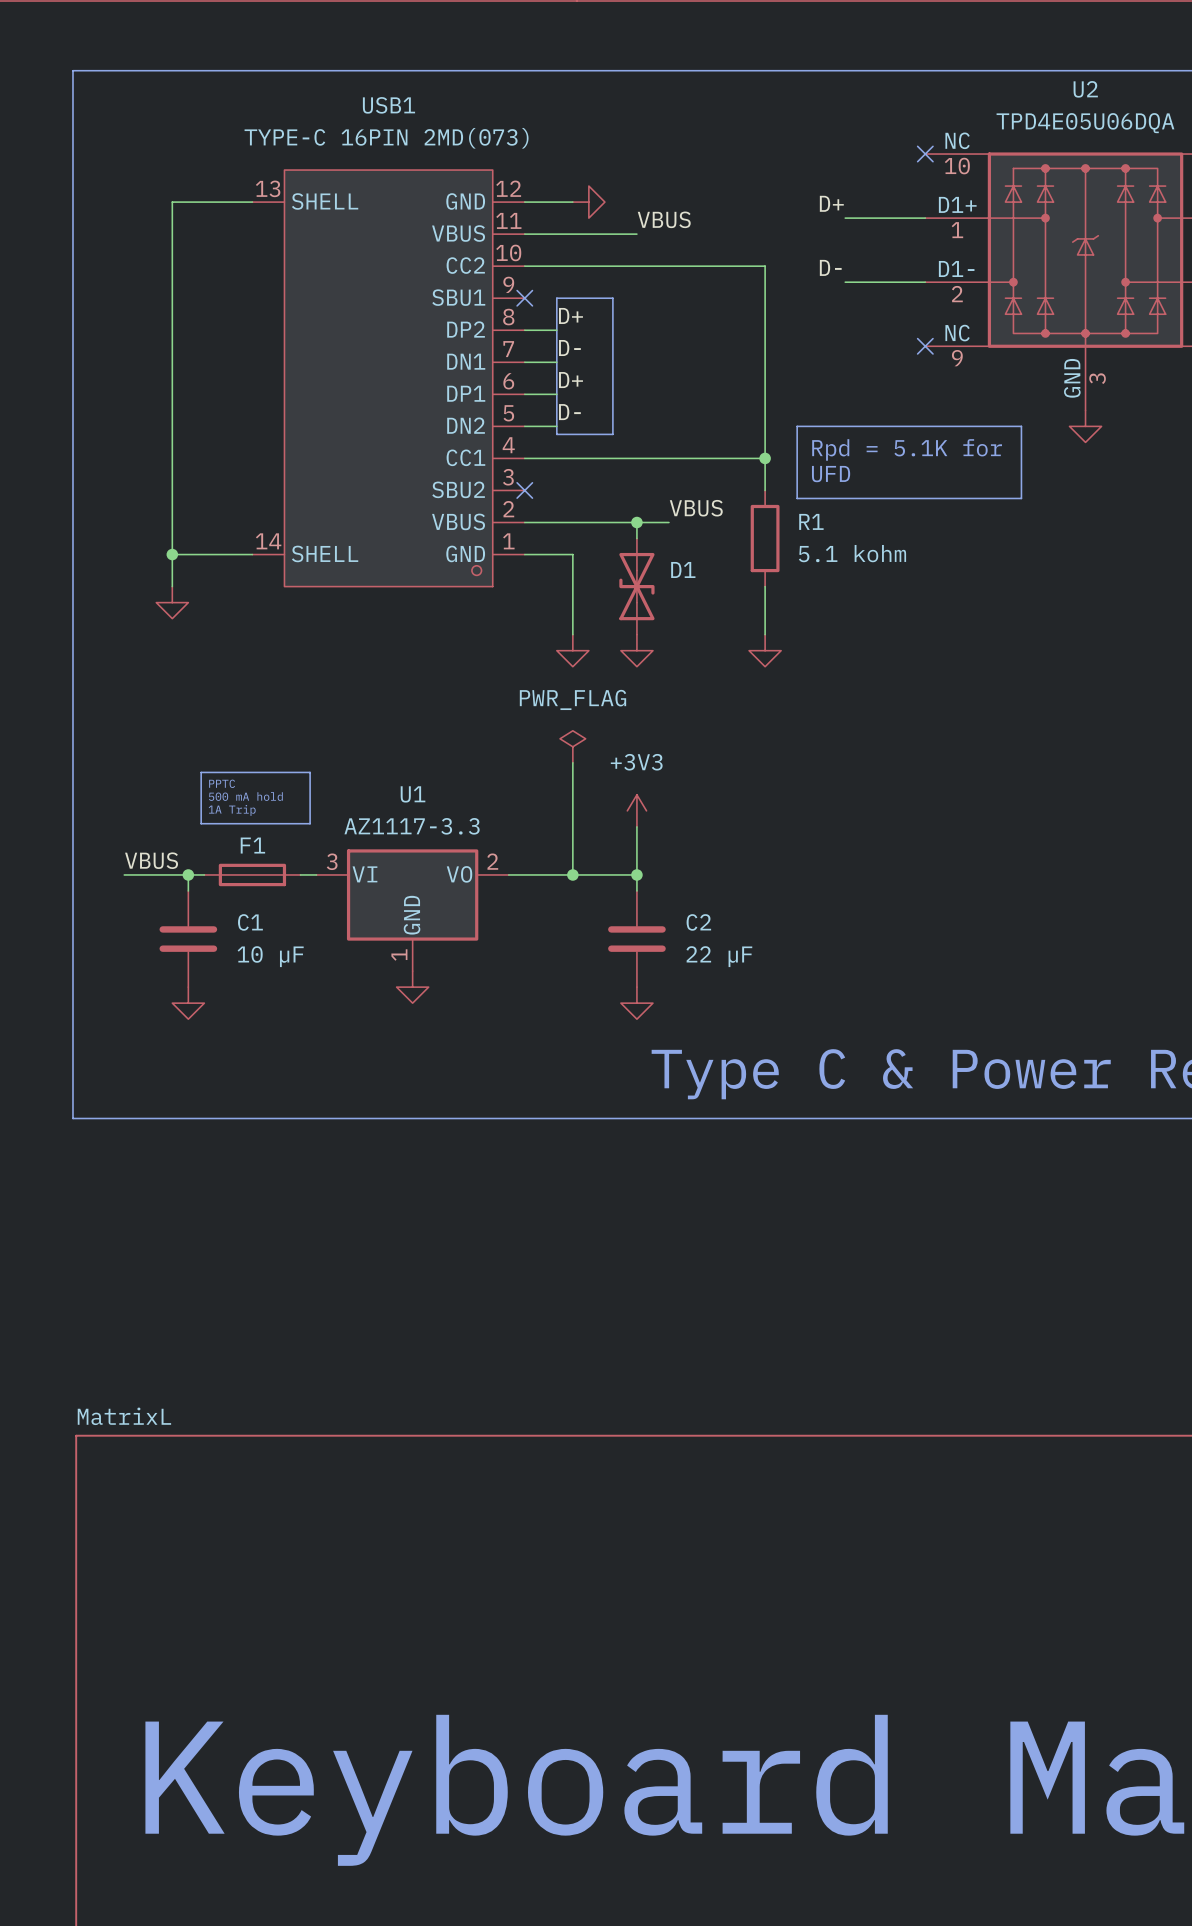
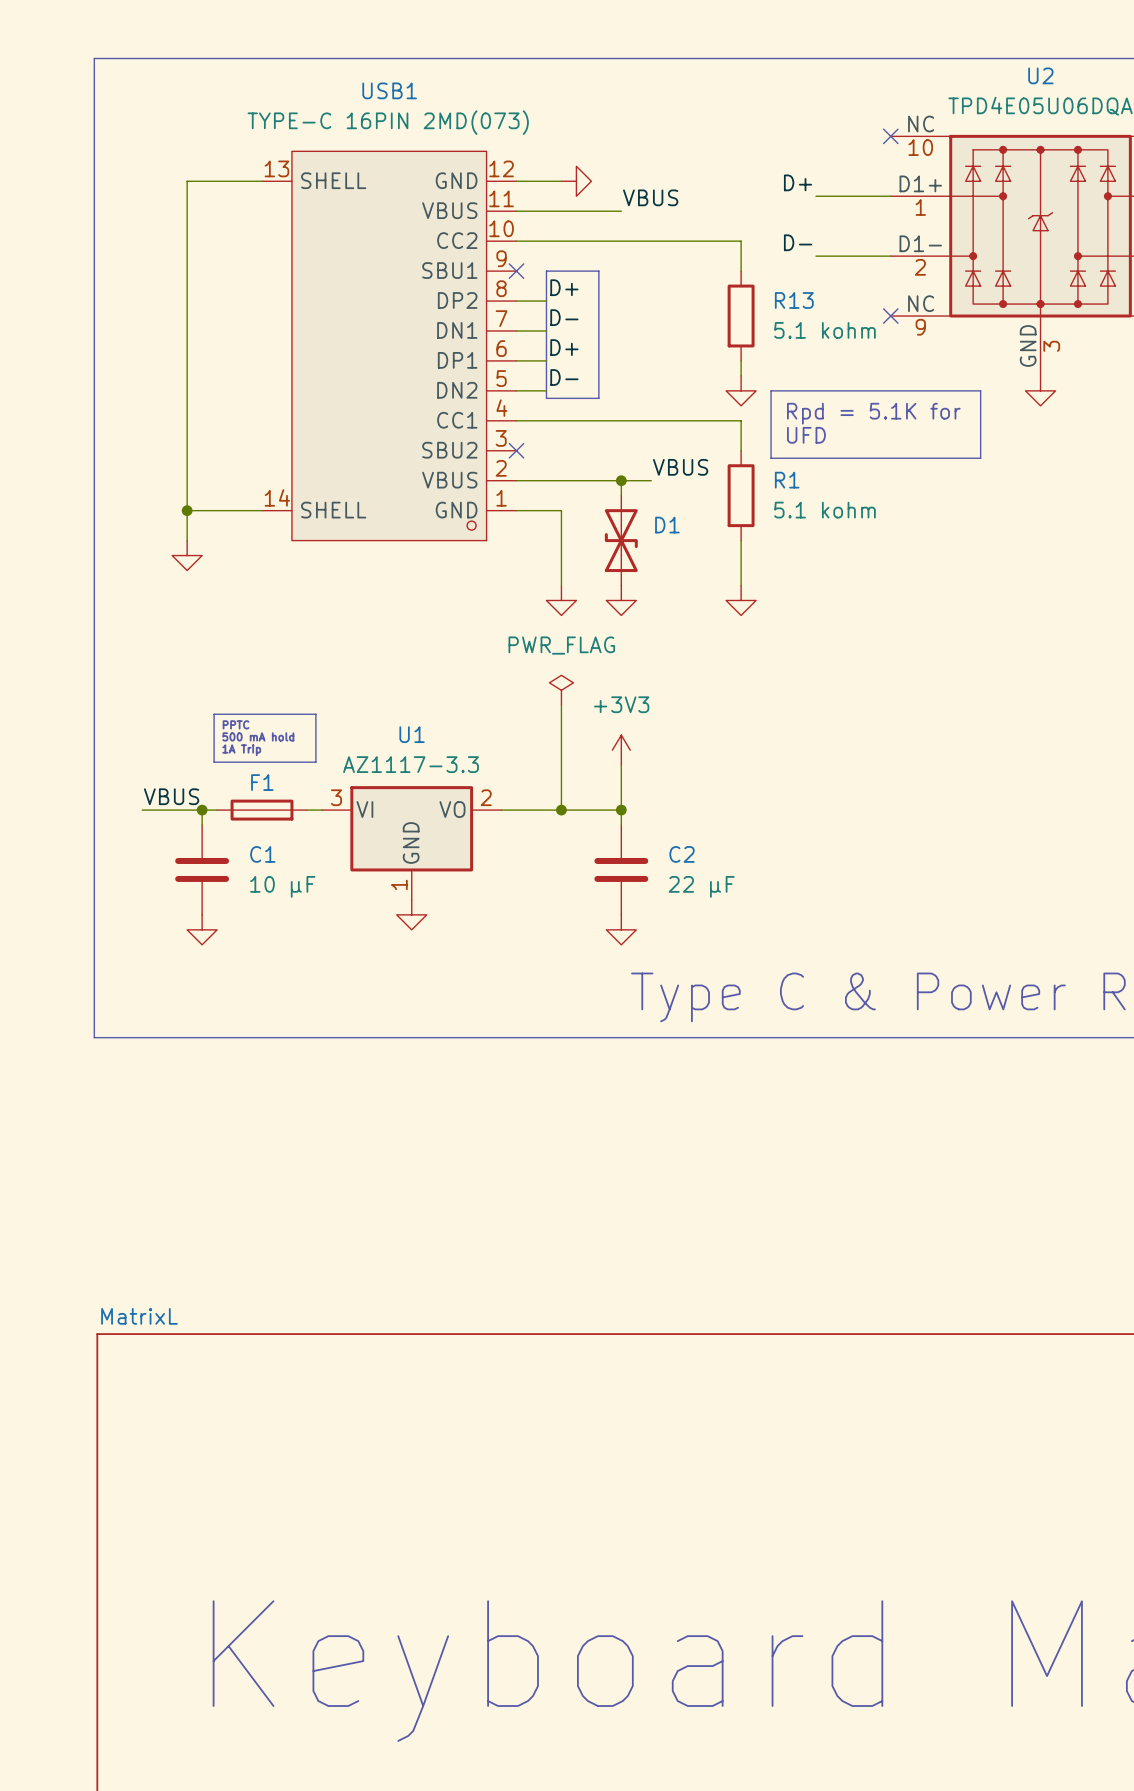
wire: (765, 298) (765, 394) -> none
R13: none -> 5.1 kohm (741, 316)
wire: (765, 410) (765, 458) -> none
power symbol: none -> (741, 390)
junction: (765, 458) -> none

